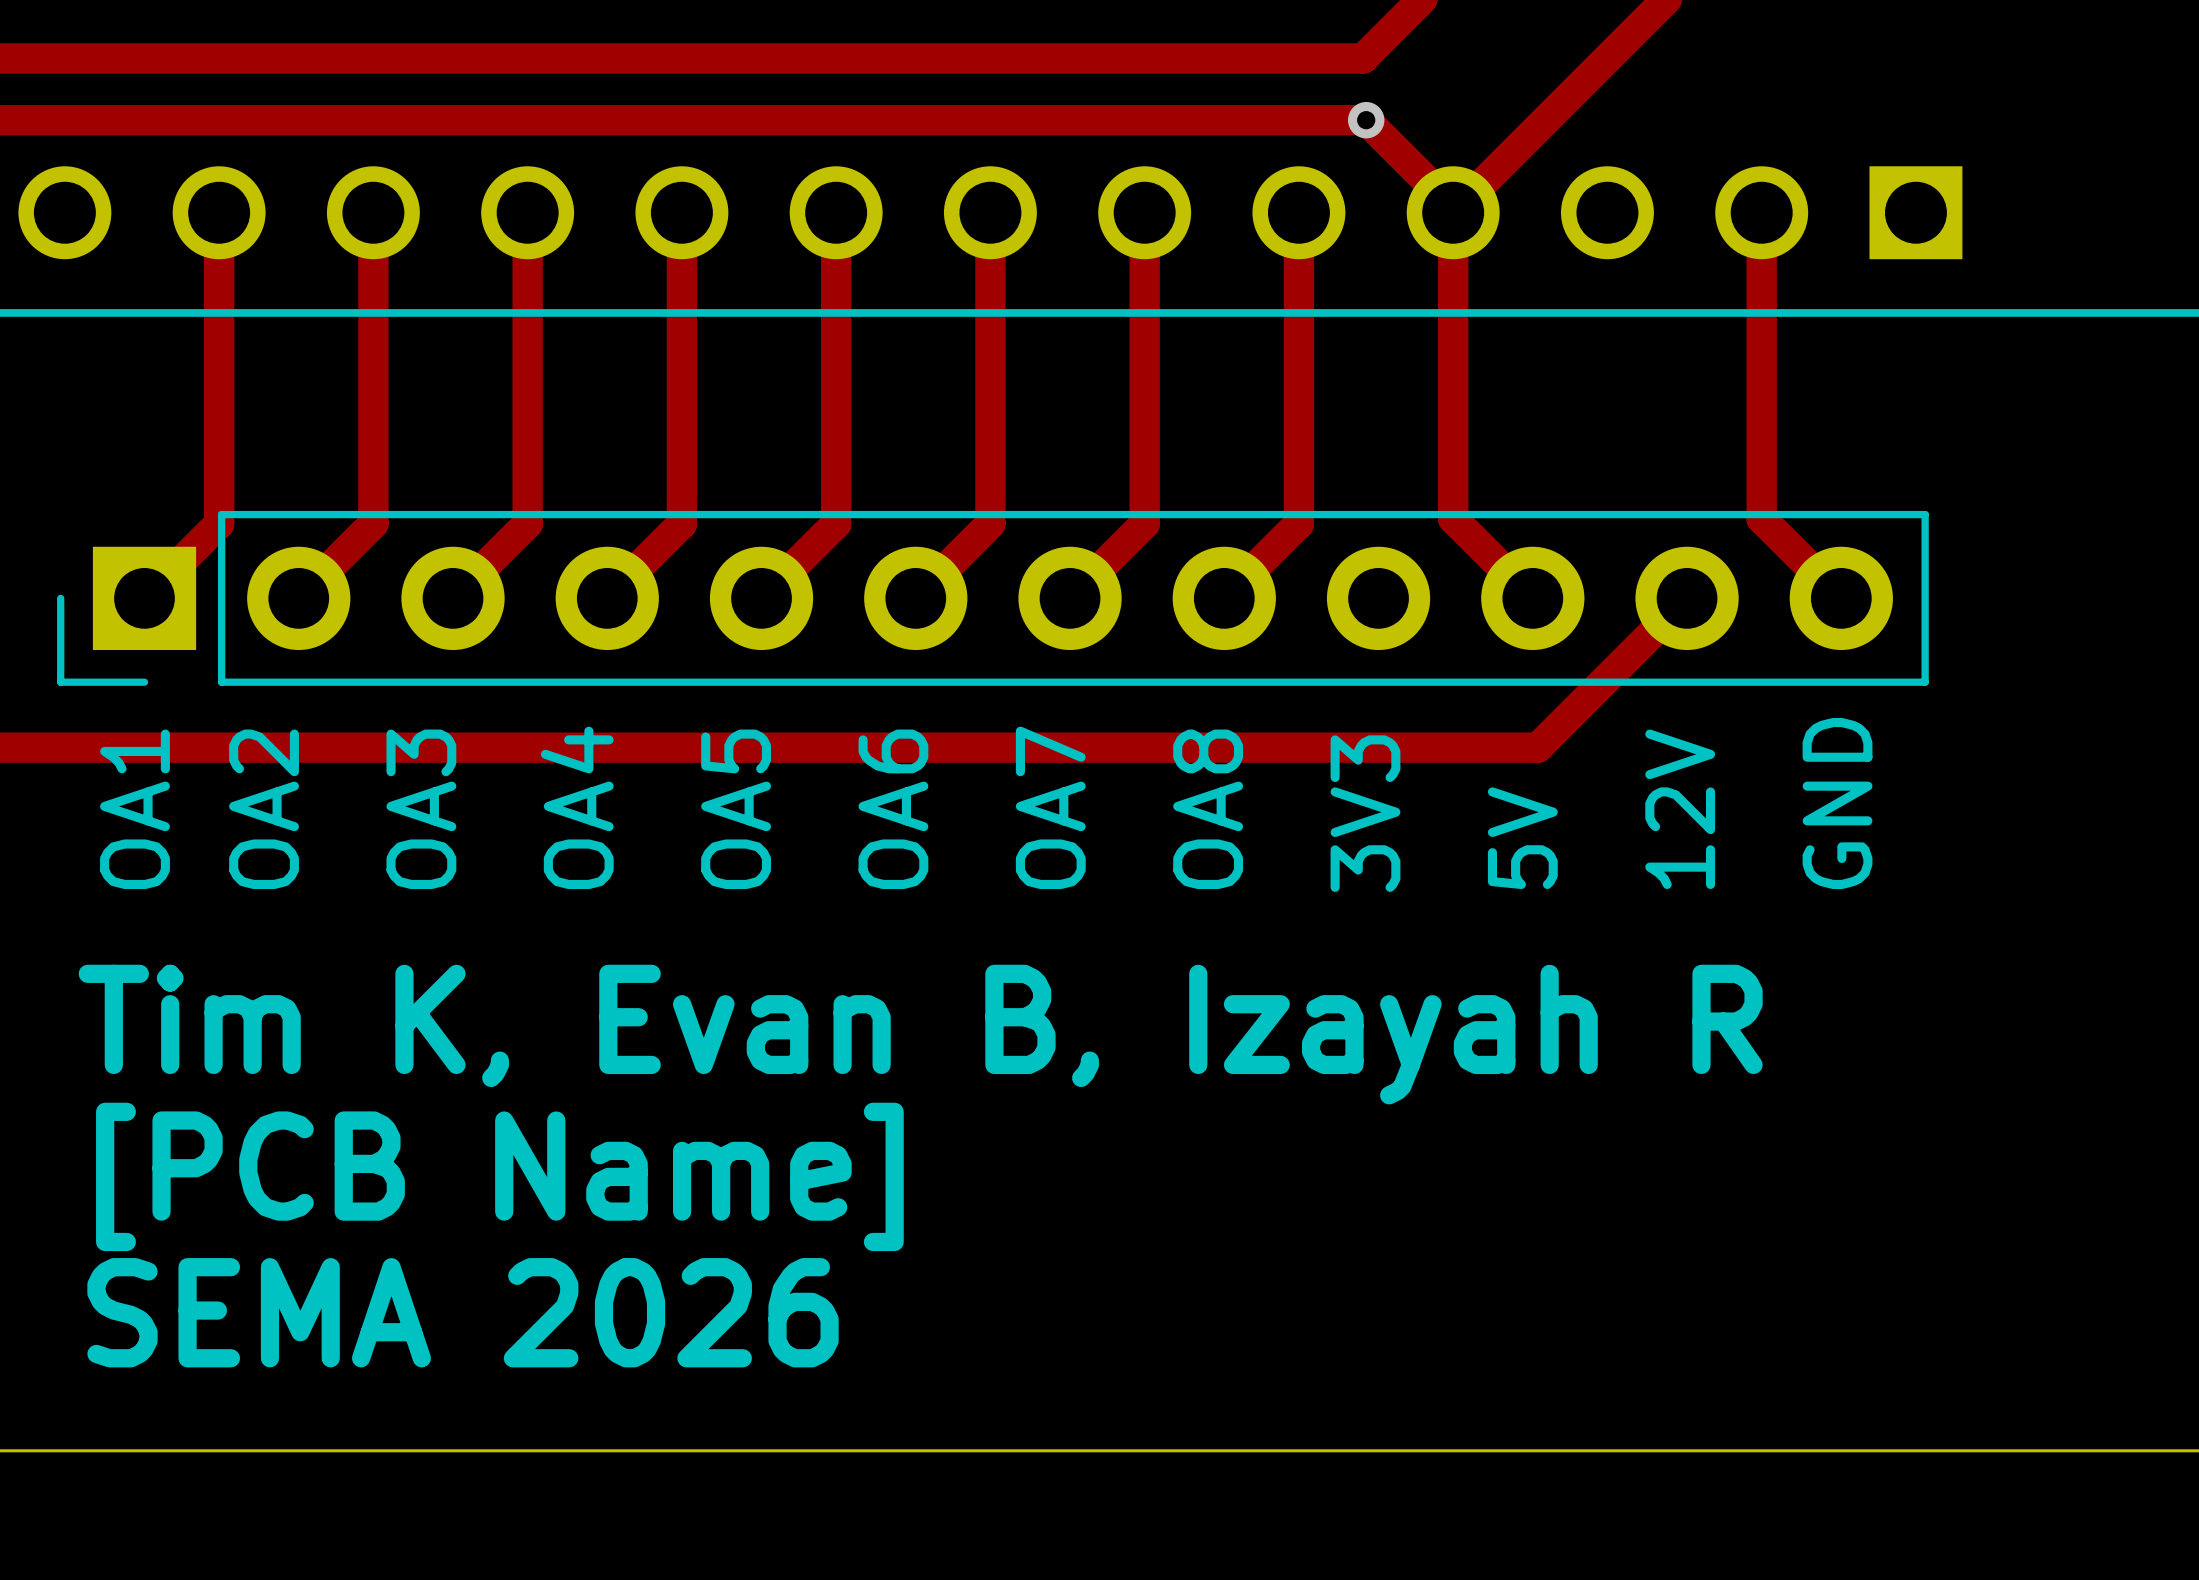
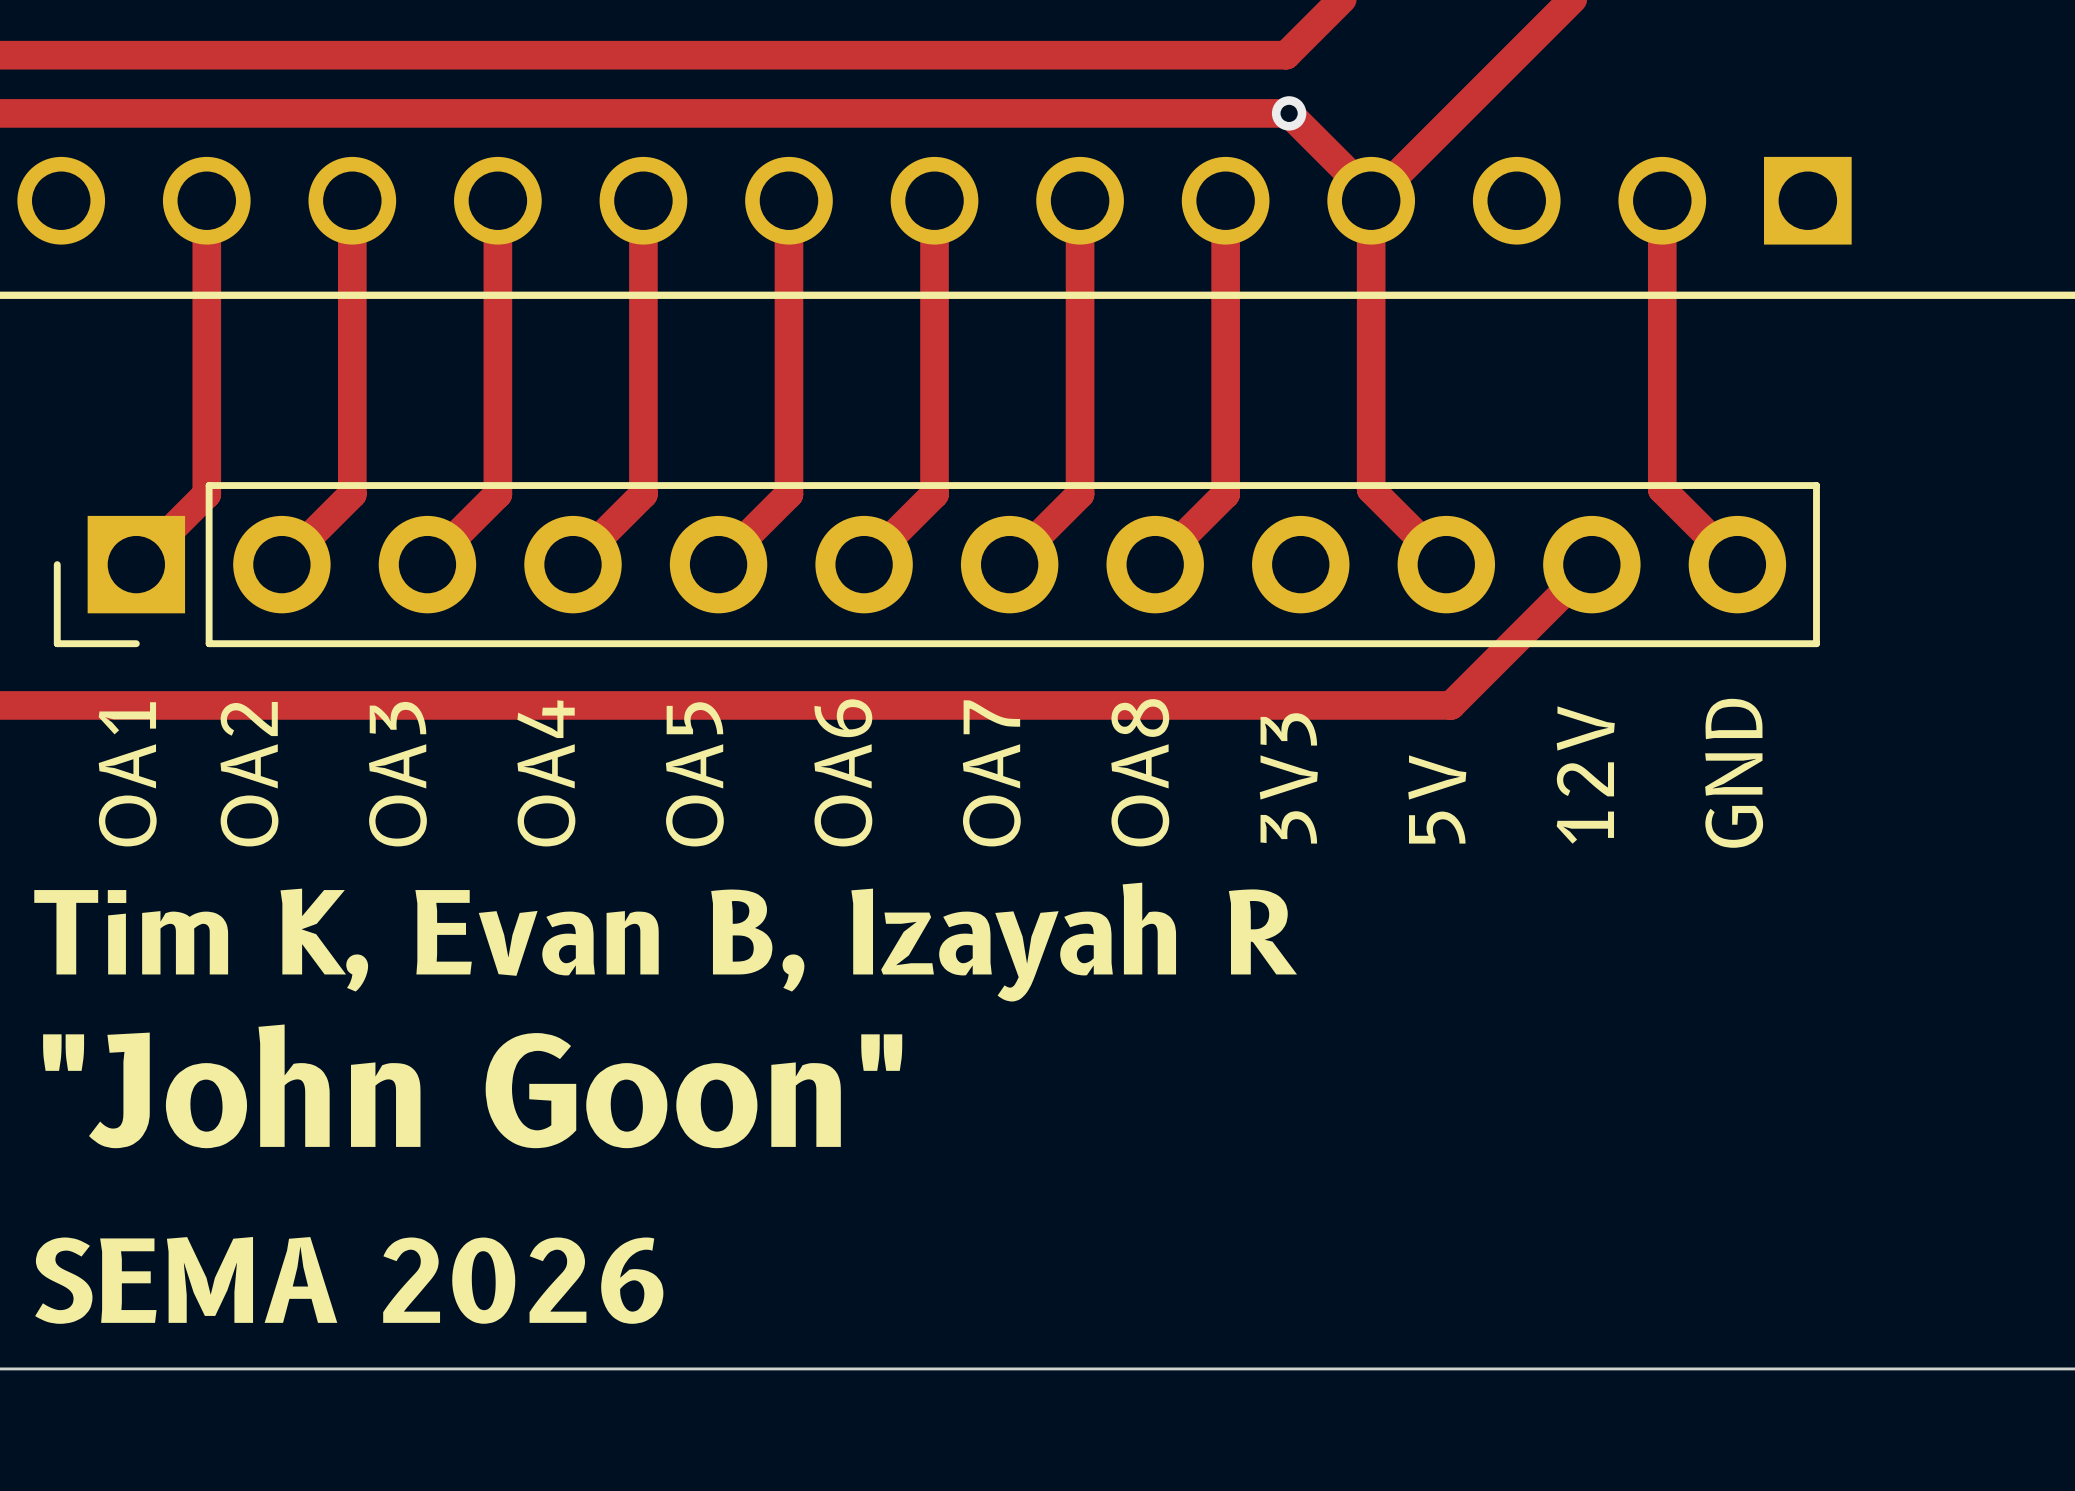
text position: Tim K, Evan B, Izayah R (920, 1034) -> Tim K, Evan B, Izayah R (665, 942)
text: [PCB Name] (499, 1176) -> "John Goon" (472, 1086)
text position: SEMA 2026 (463, 1312) -> SEMA 2026 (349, 1280)

